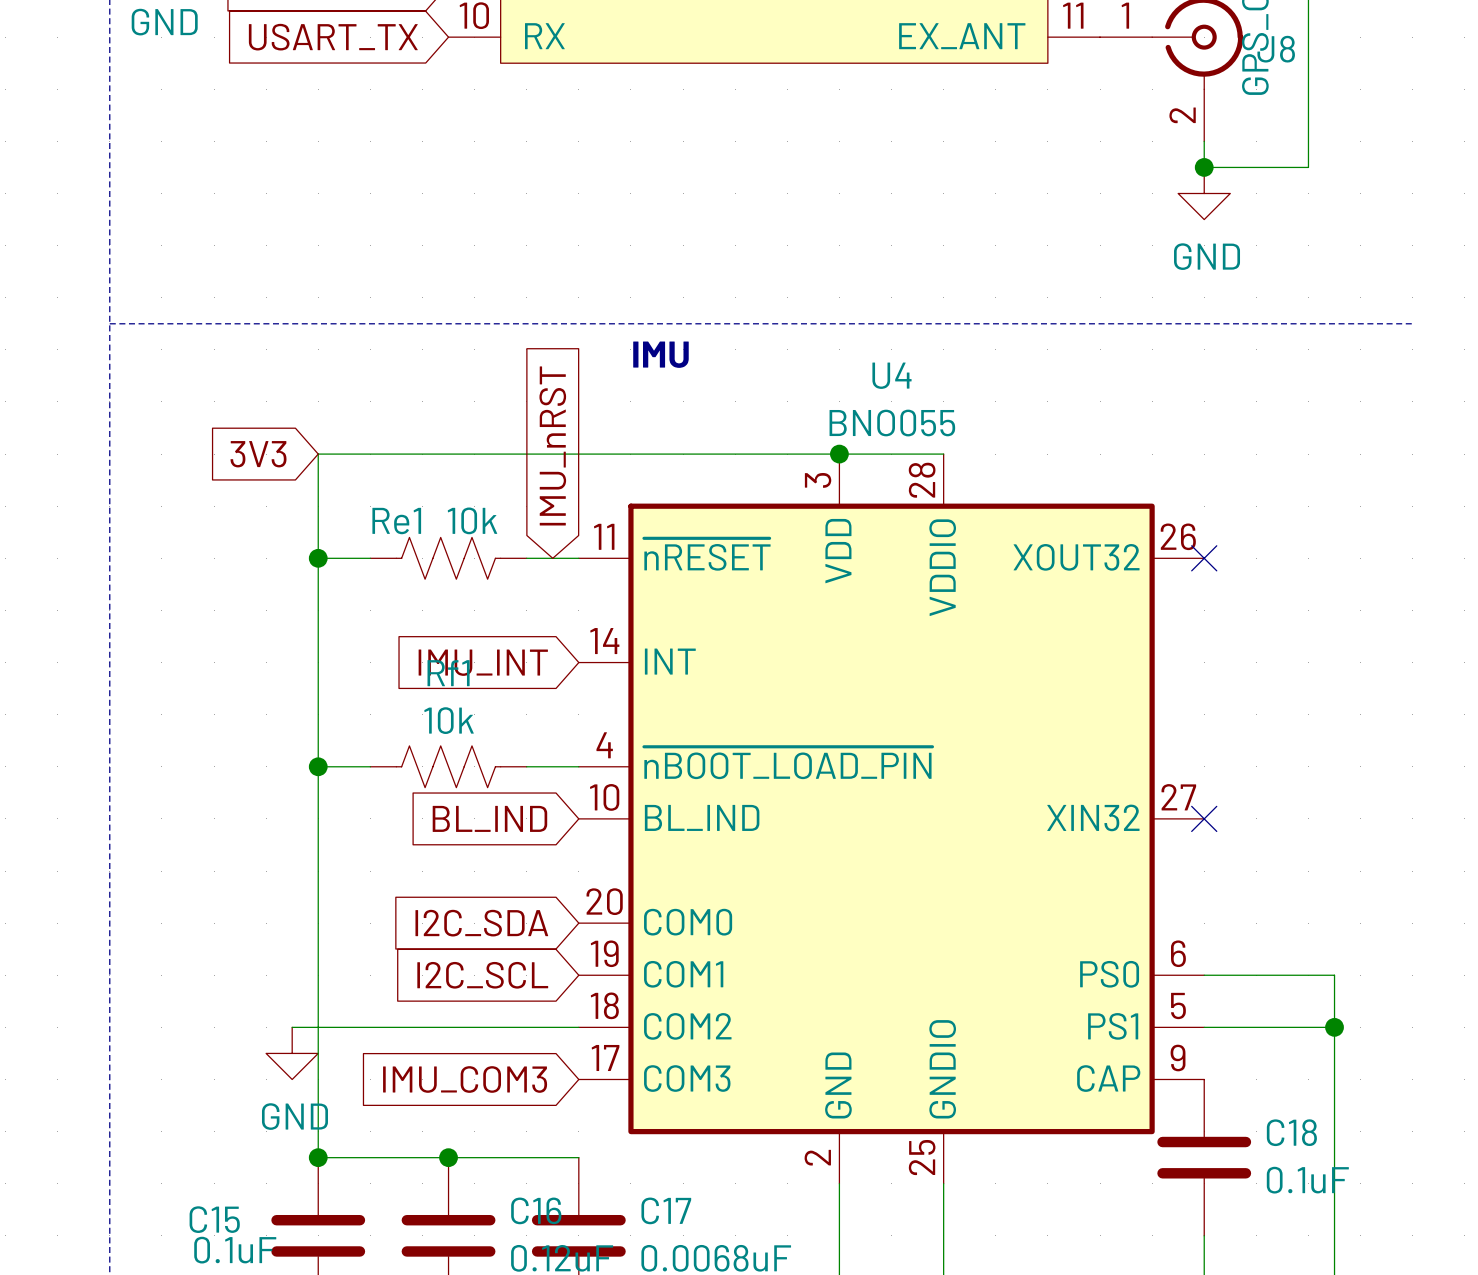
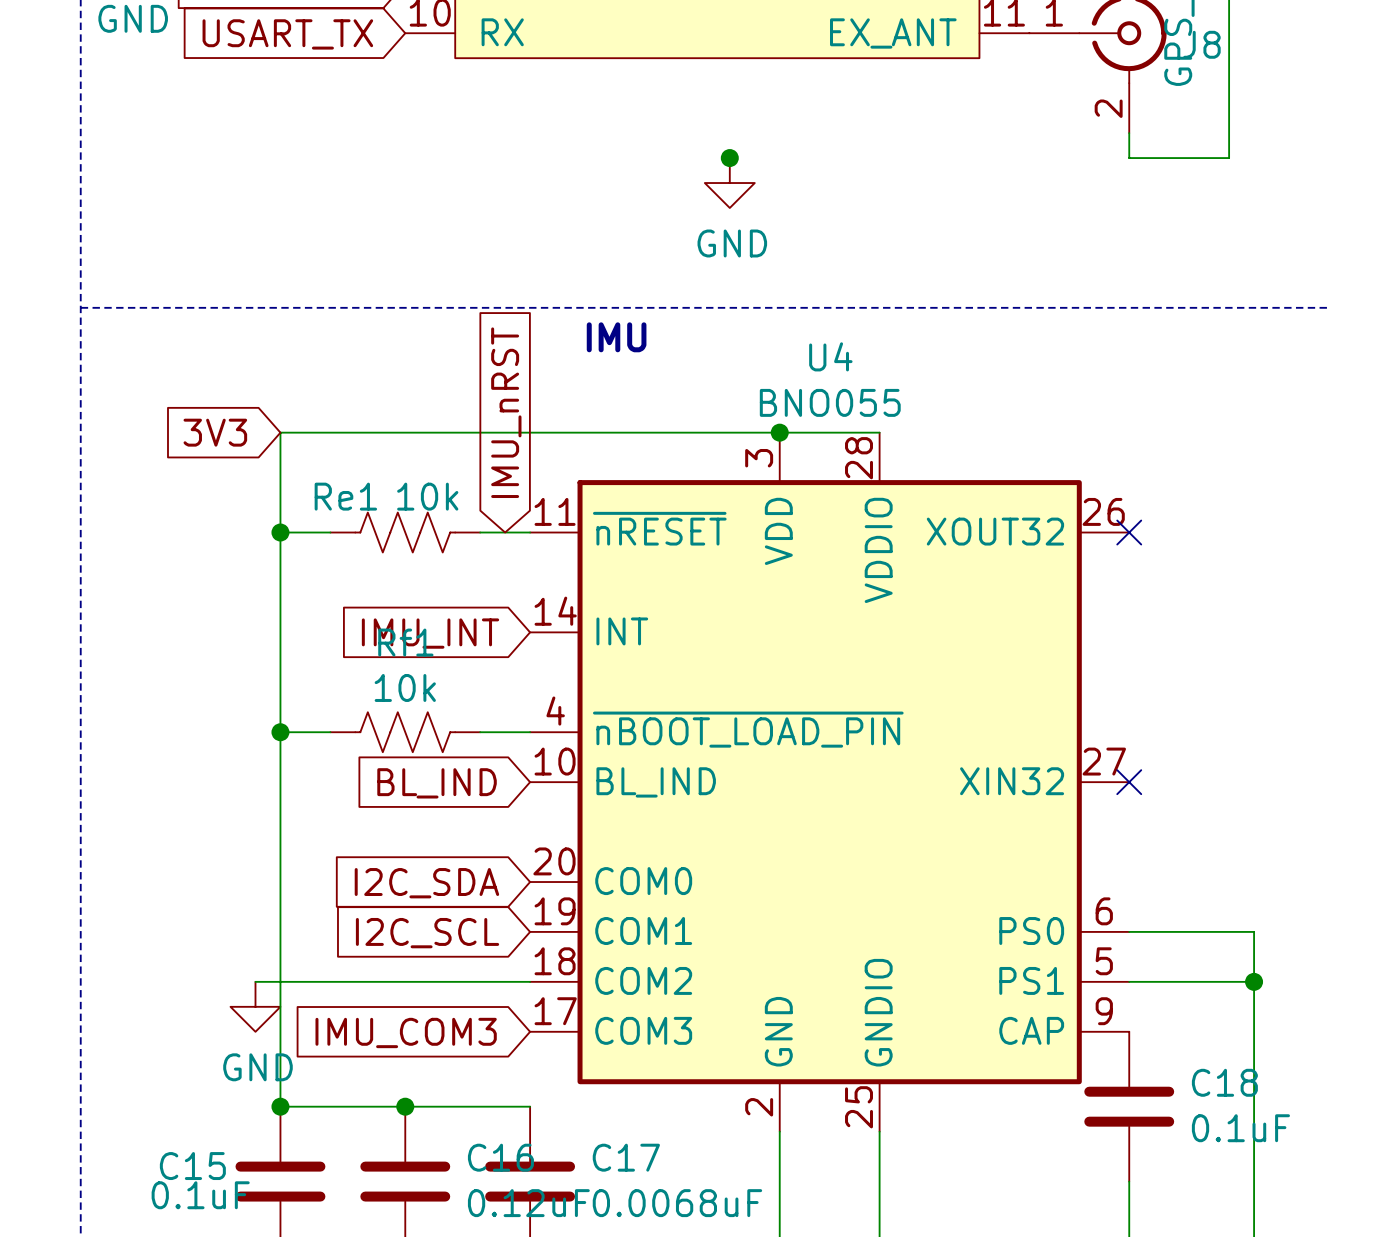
junction: none -> (729, 158)
junction: (1204, 167) -> none
power symbol position: GND (1204, 193) -> GND (729, 183)

